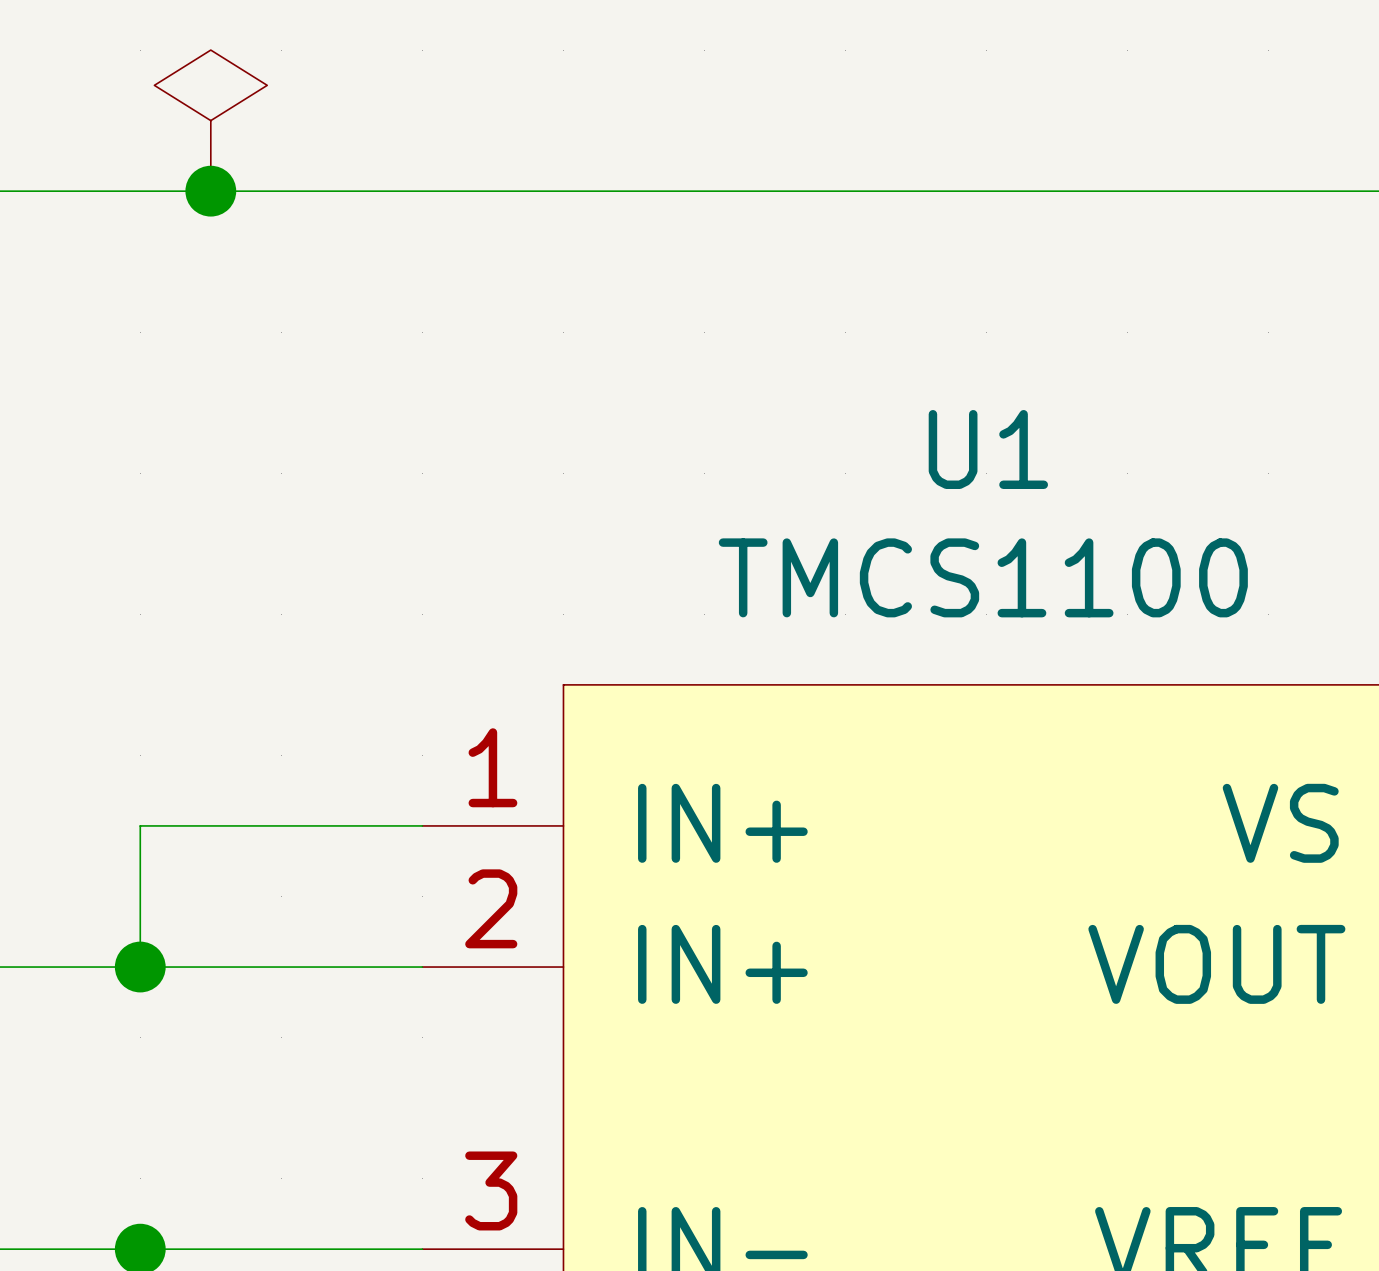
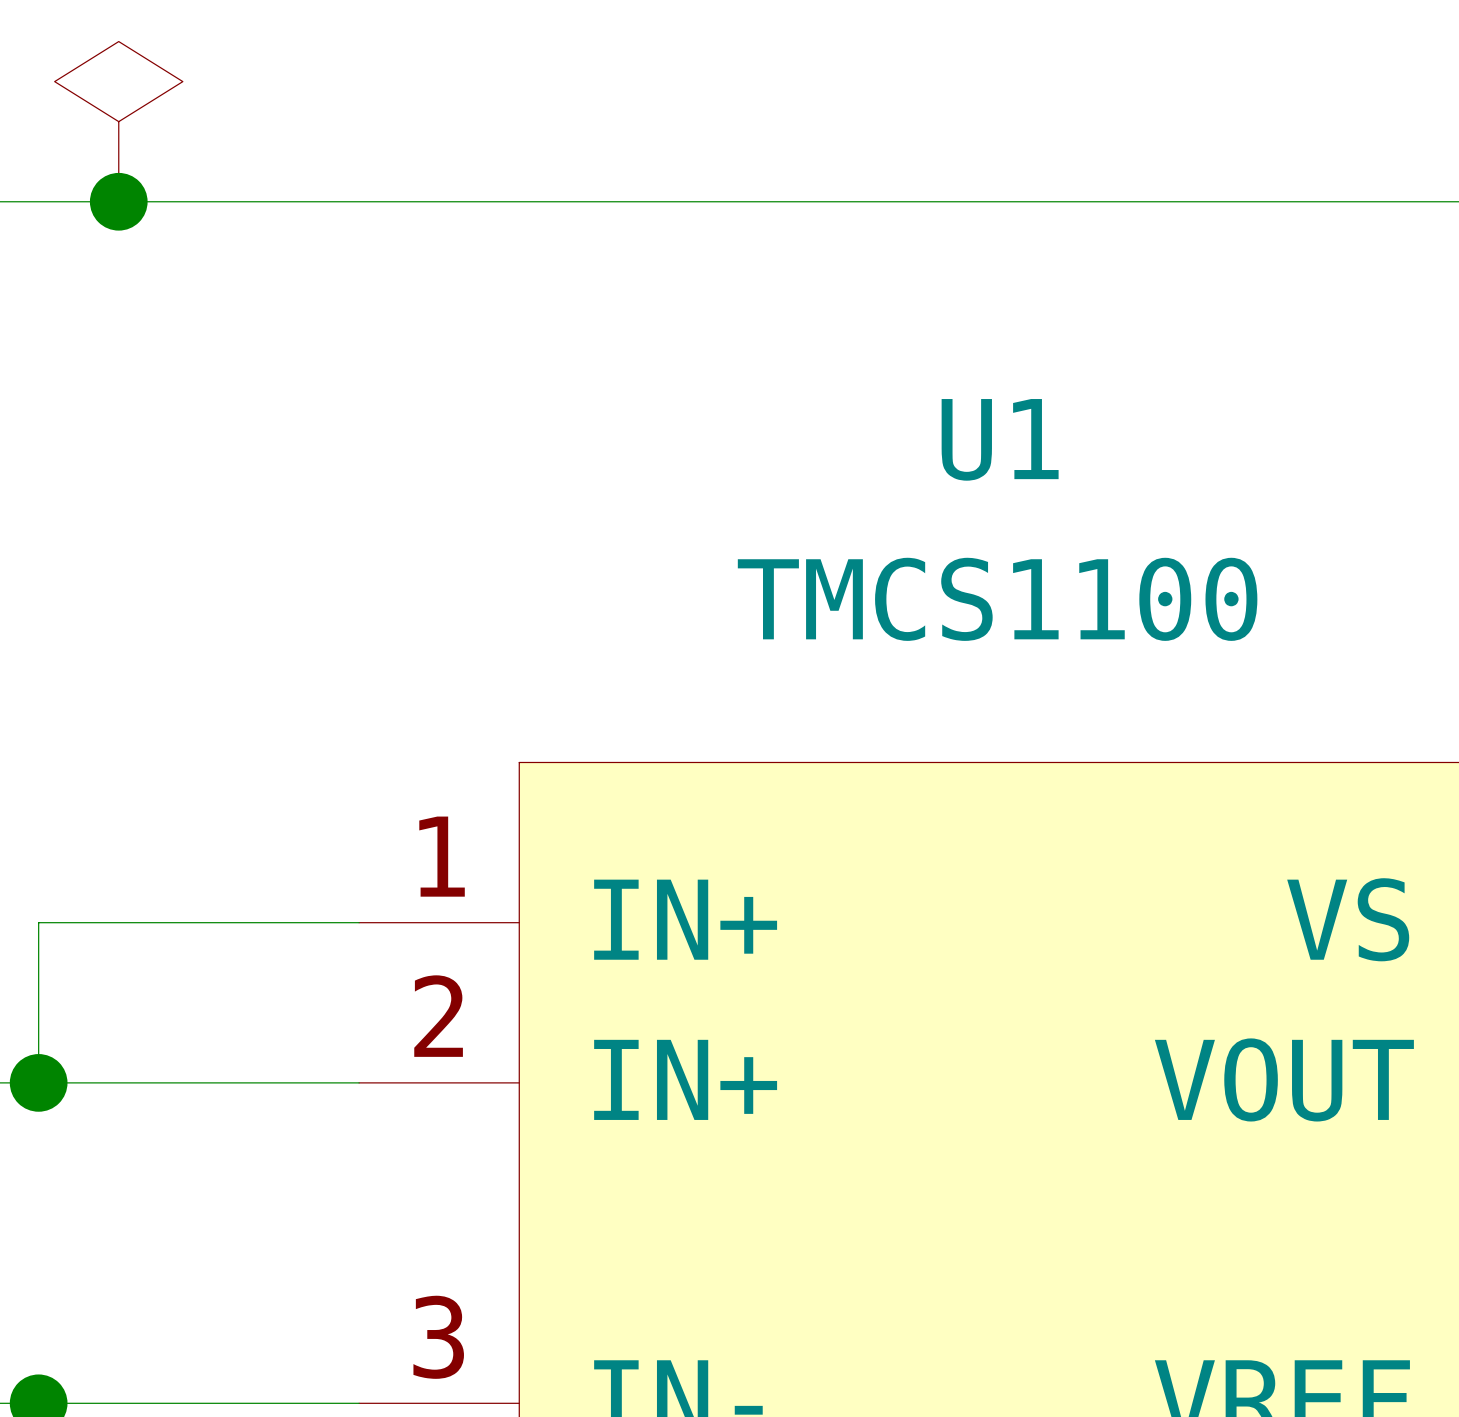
U1 name position: U1 (988, 449) -> U1 (1000, 439)
U1 value position: TMCS1100 (983, 577) -> TMCS1100 (997, 599)

